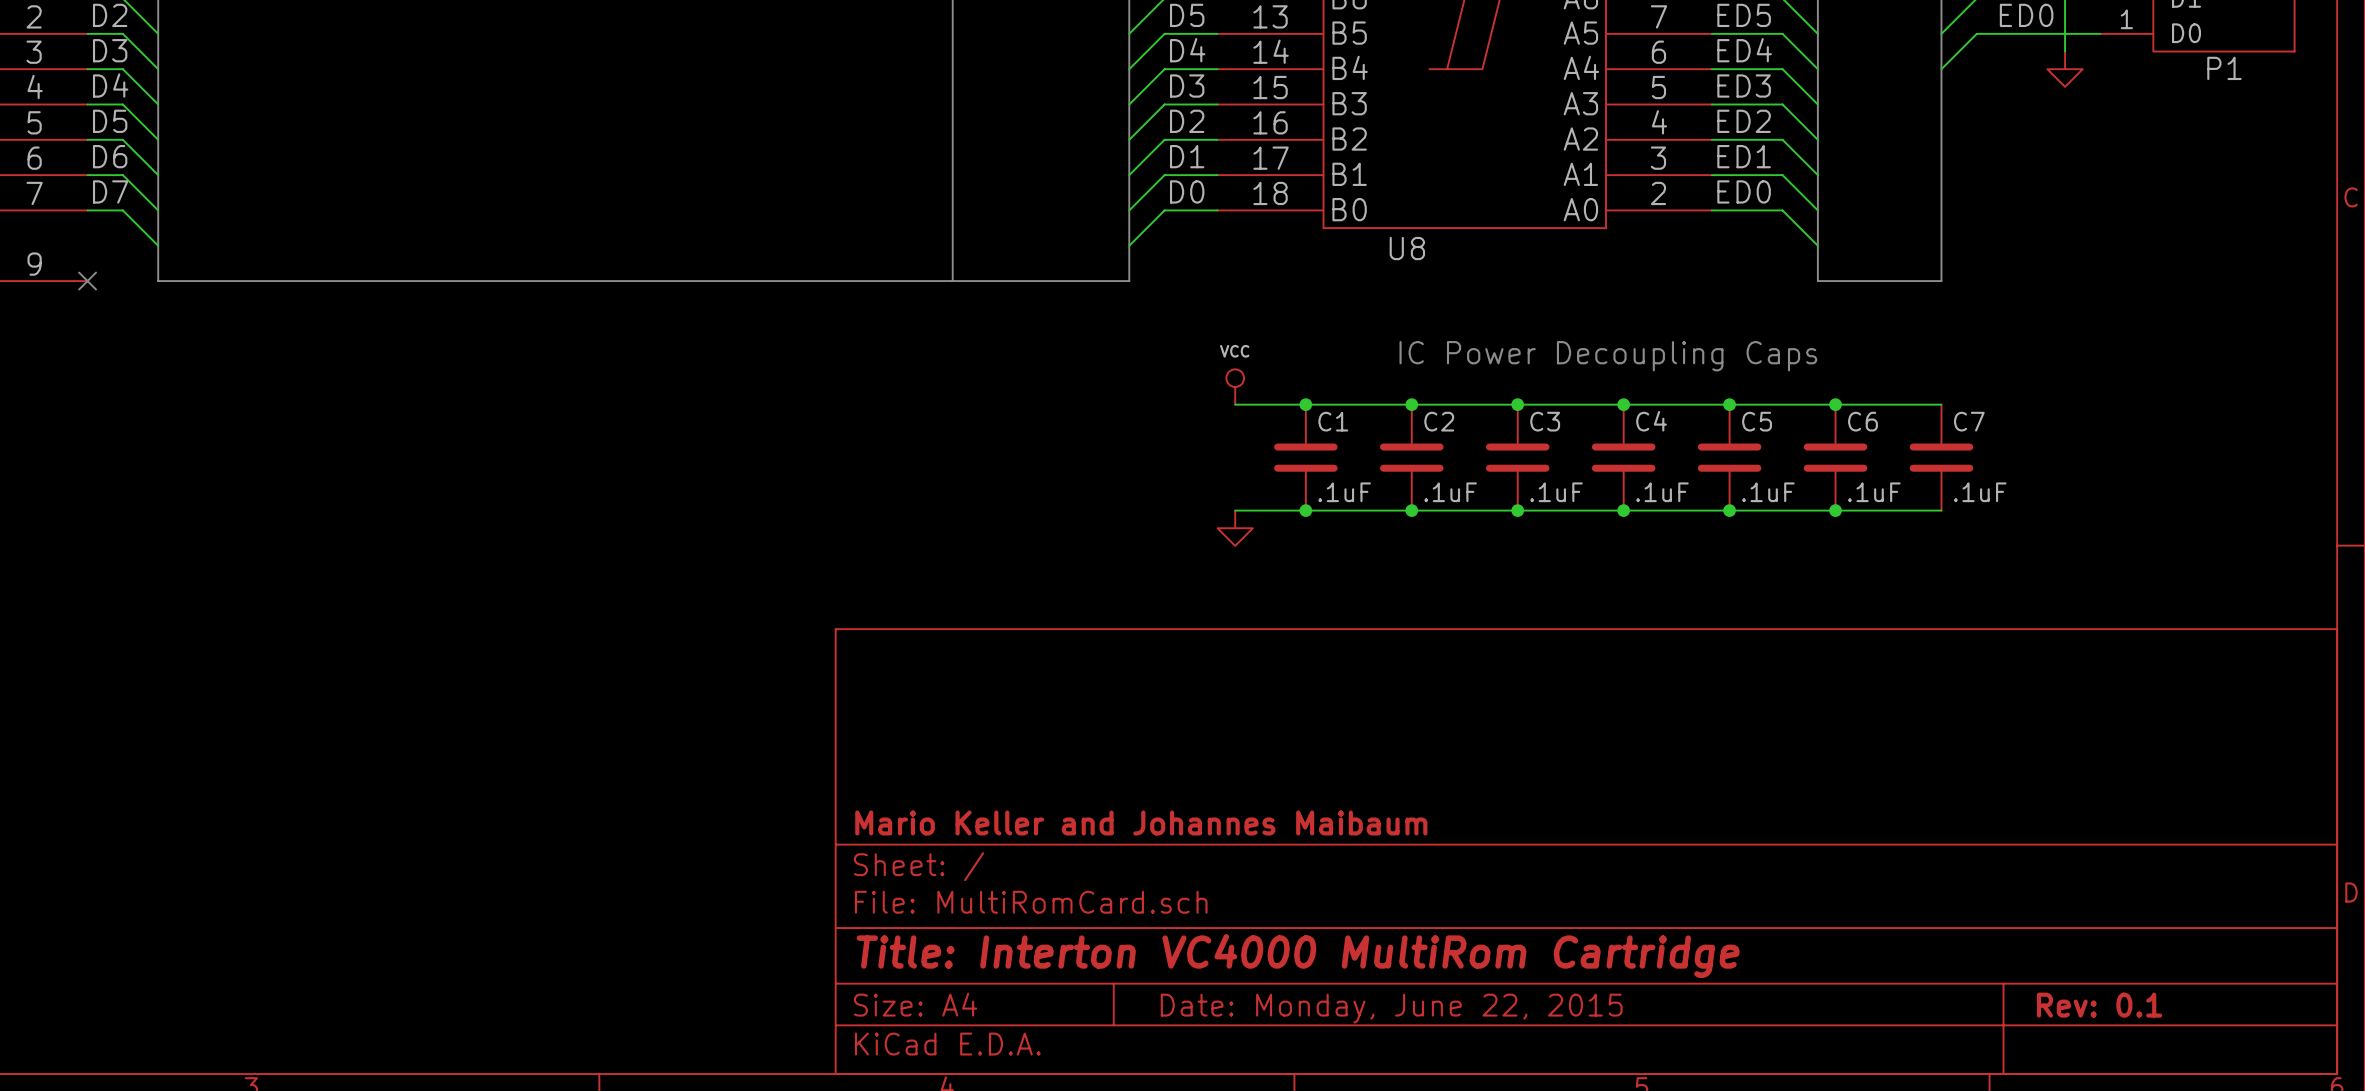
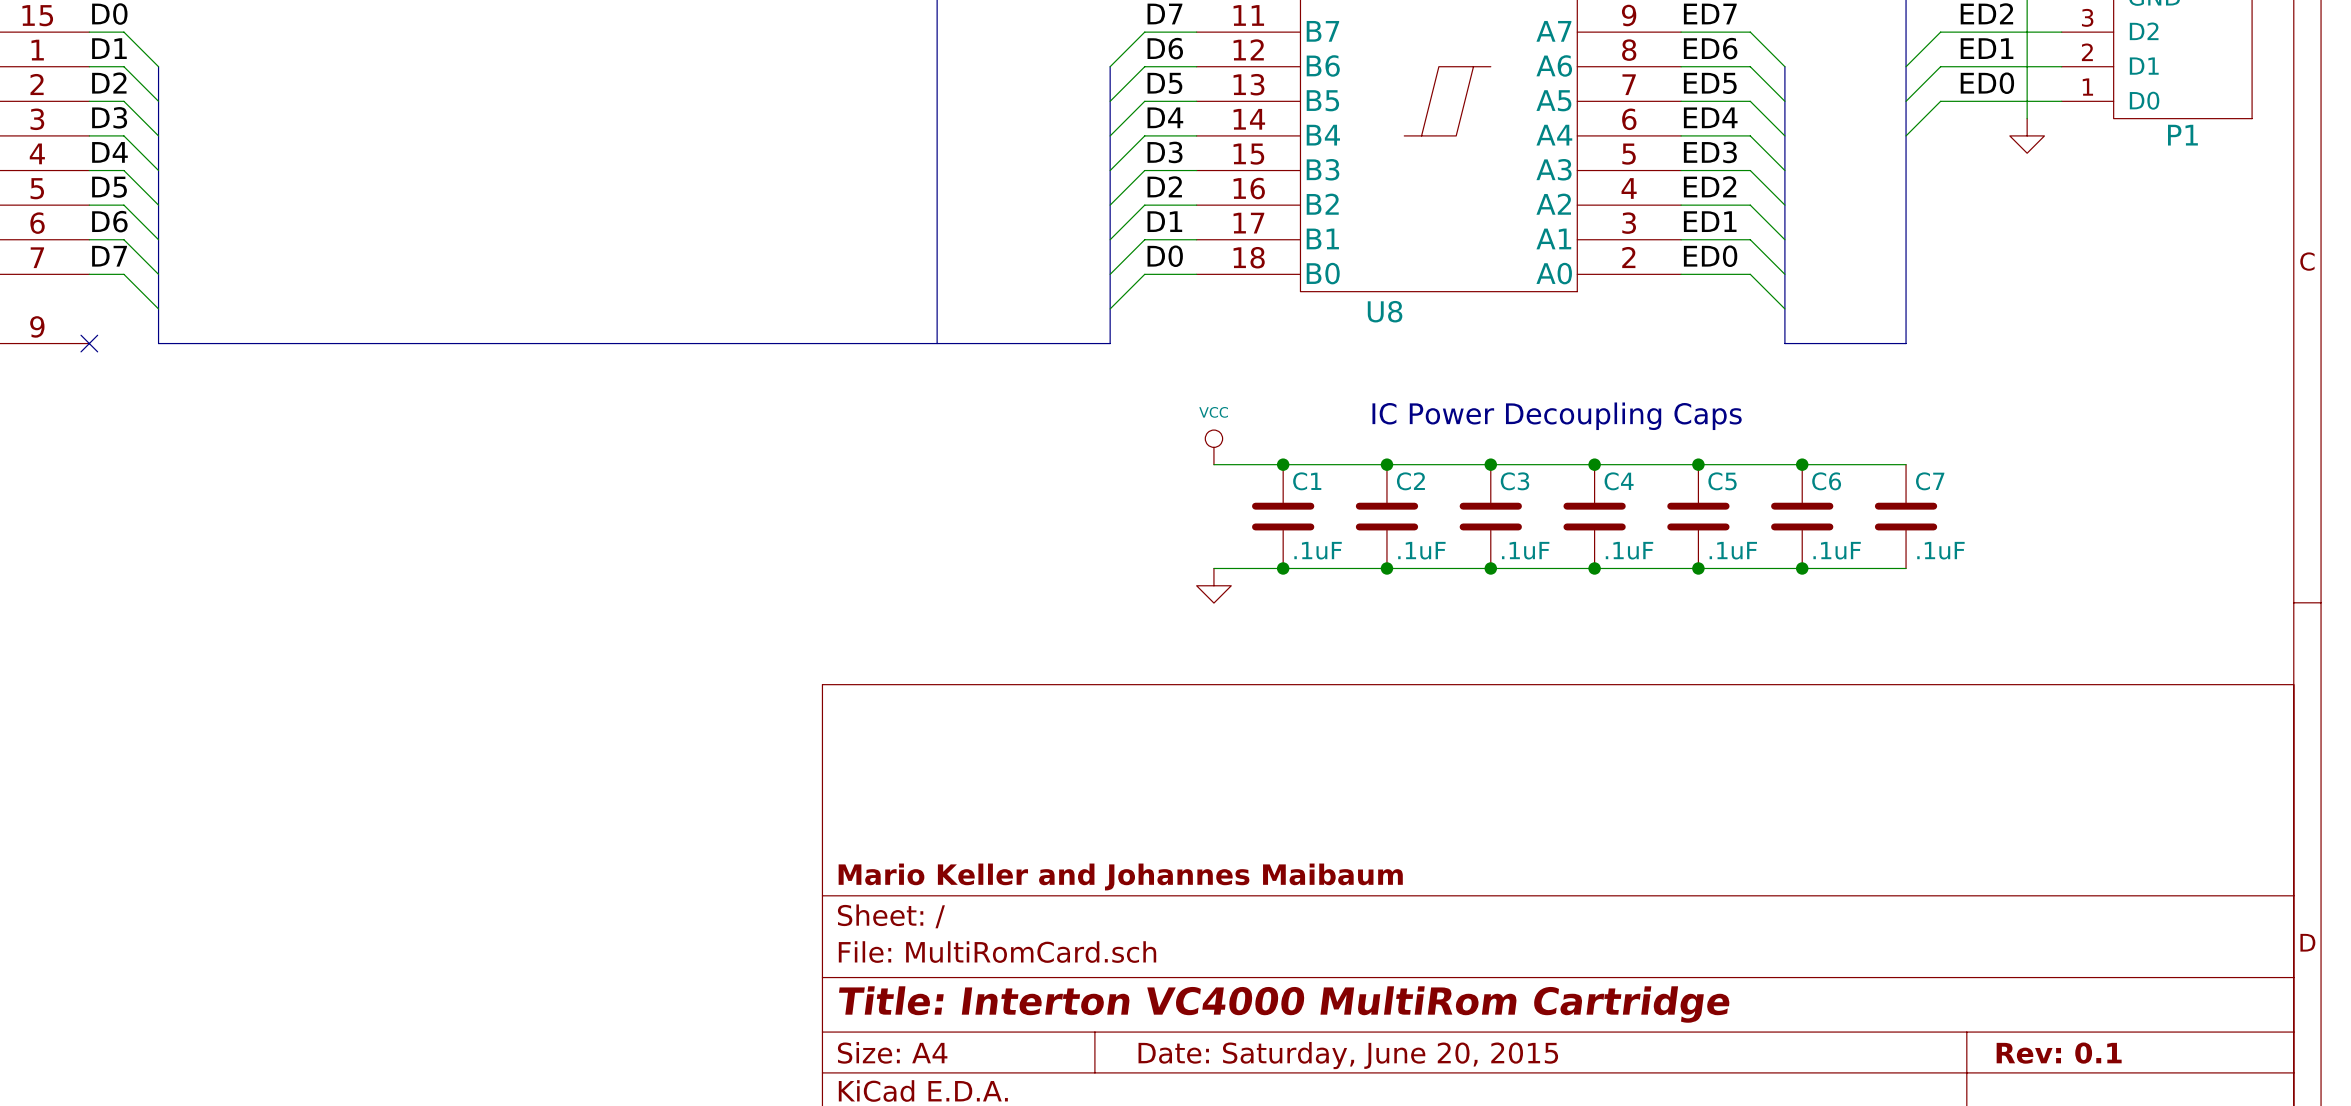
title block: Date: Monday, June 22, 2015 (1391, 1008) -> Date: Saturday, June 20, 2015 (1348, 1055)

